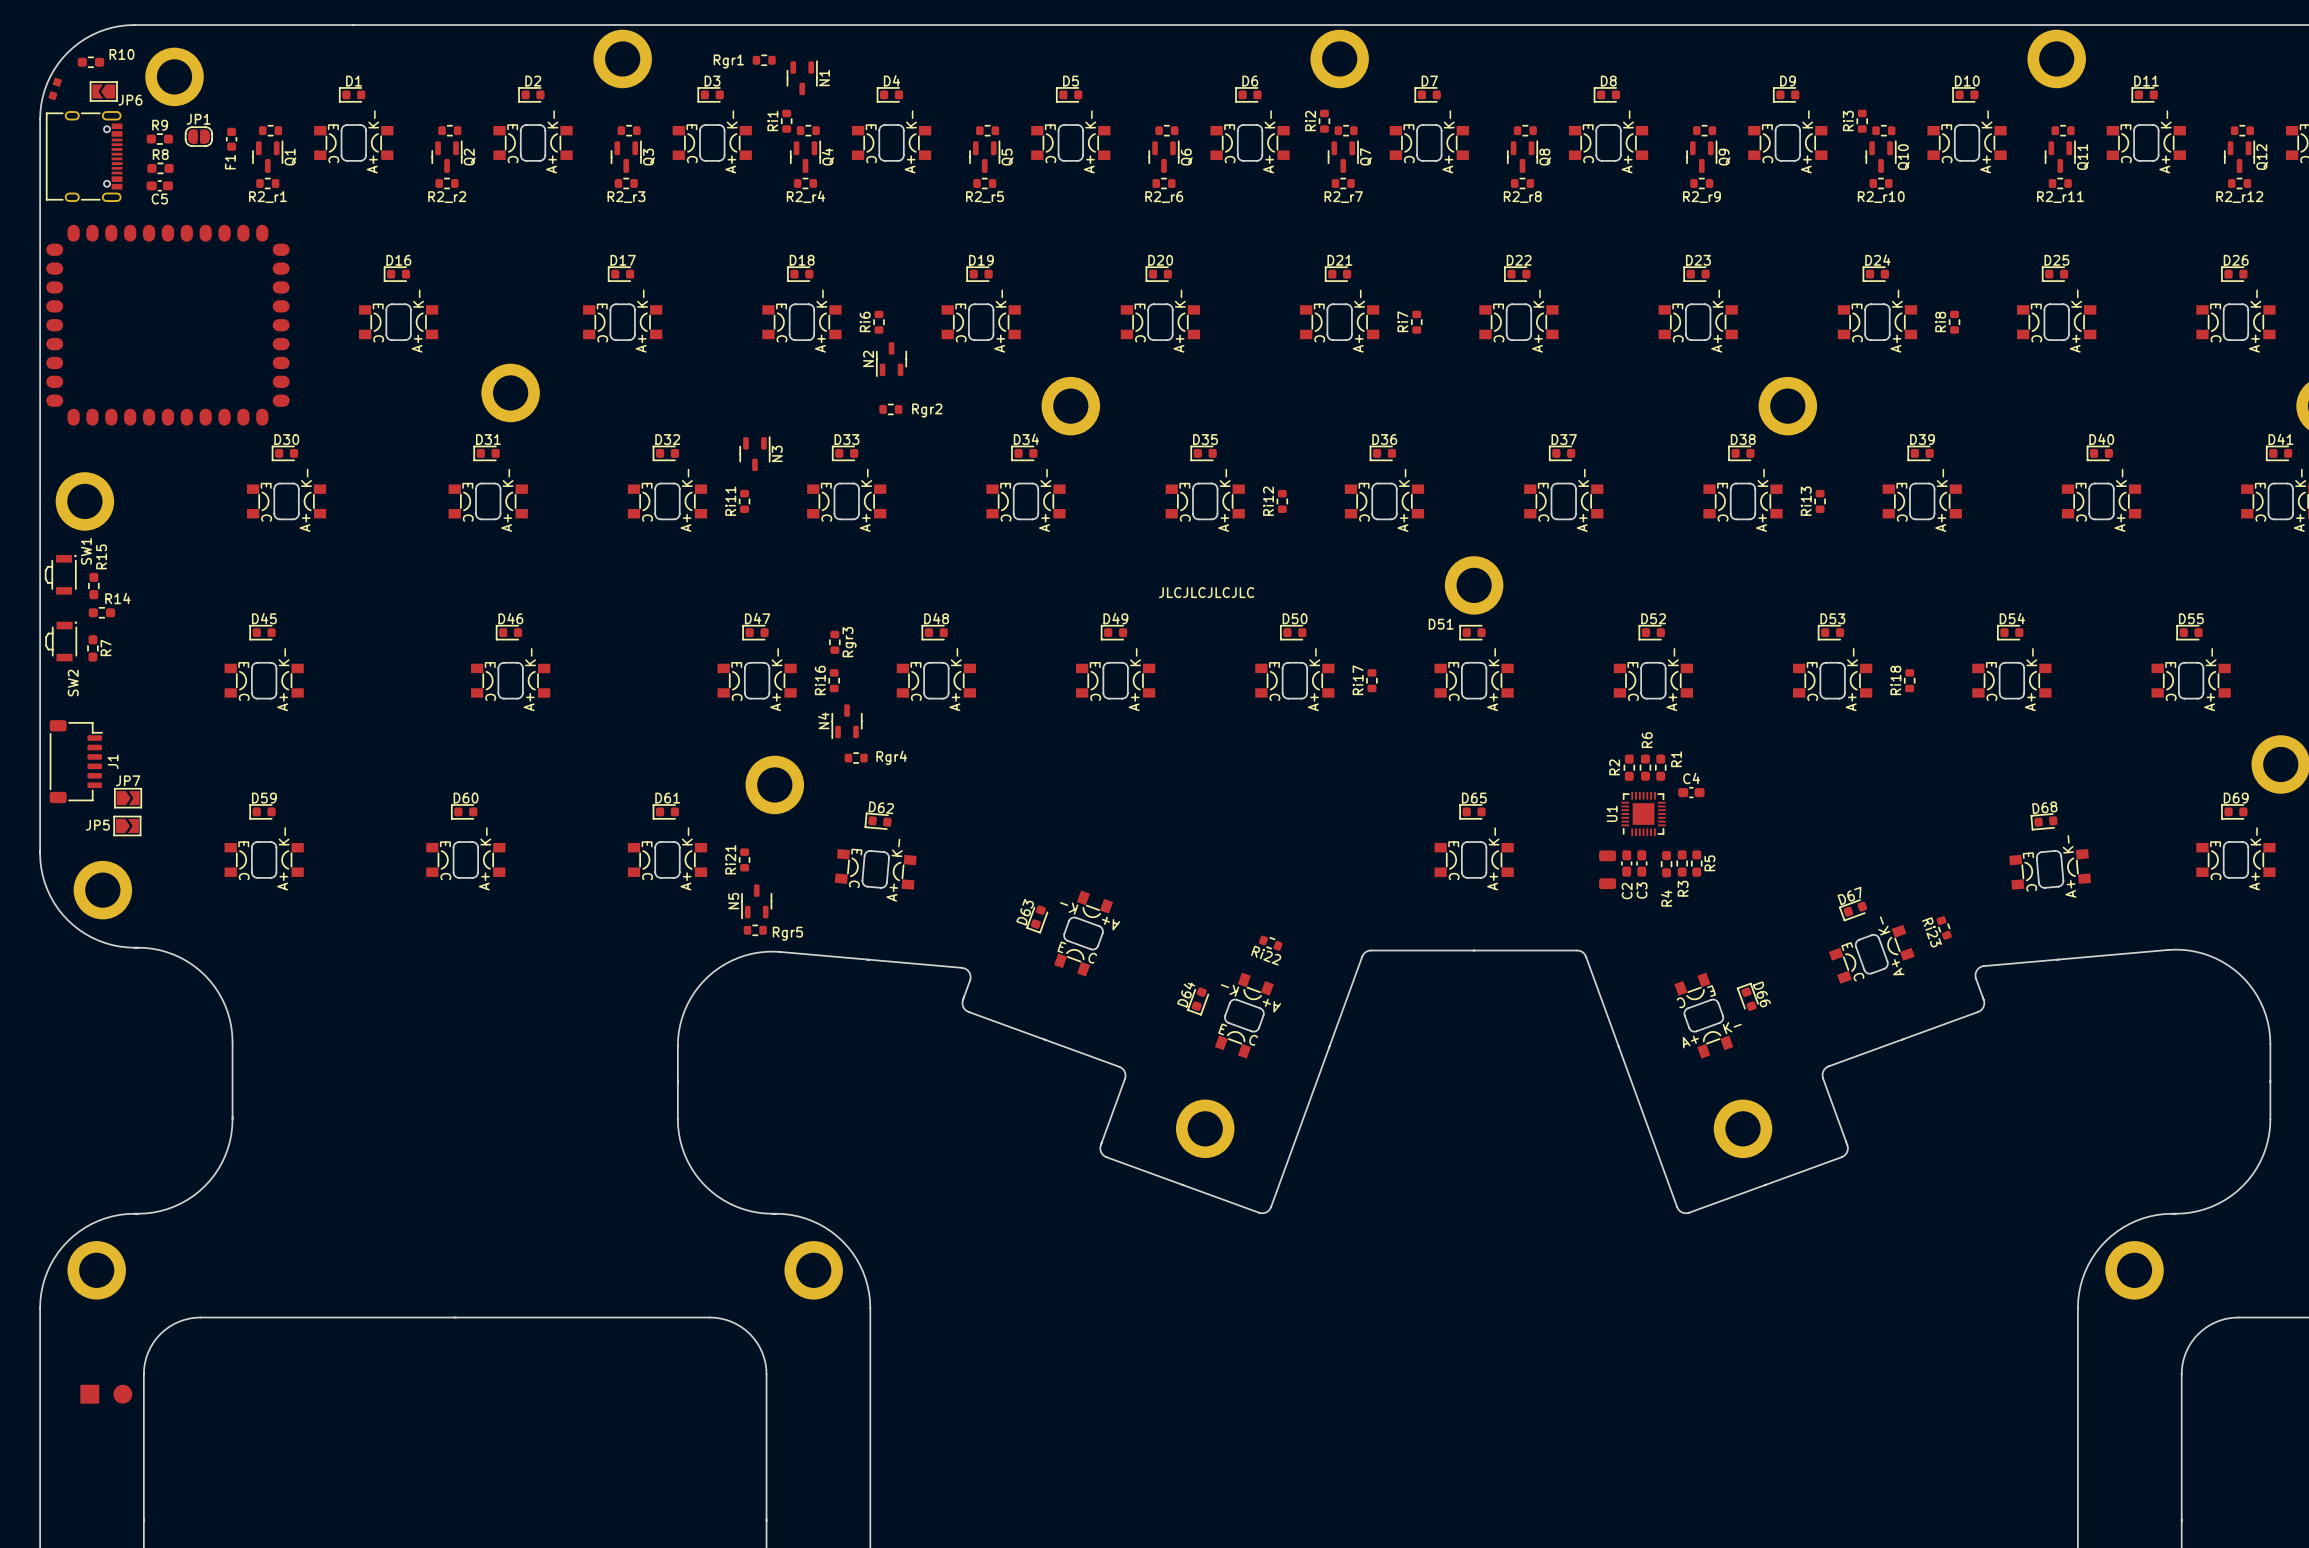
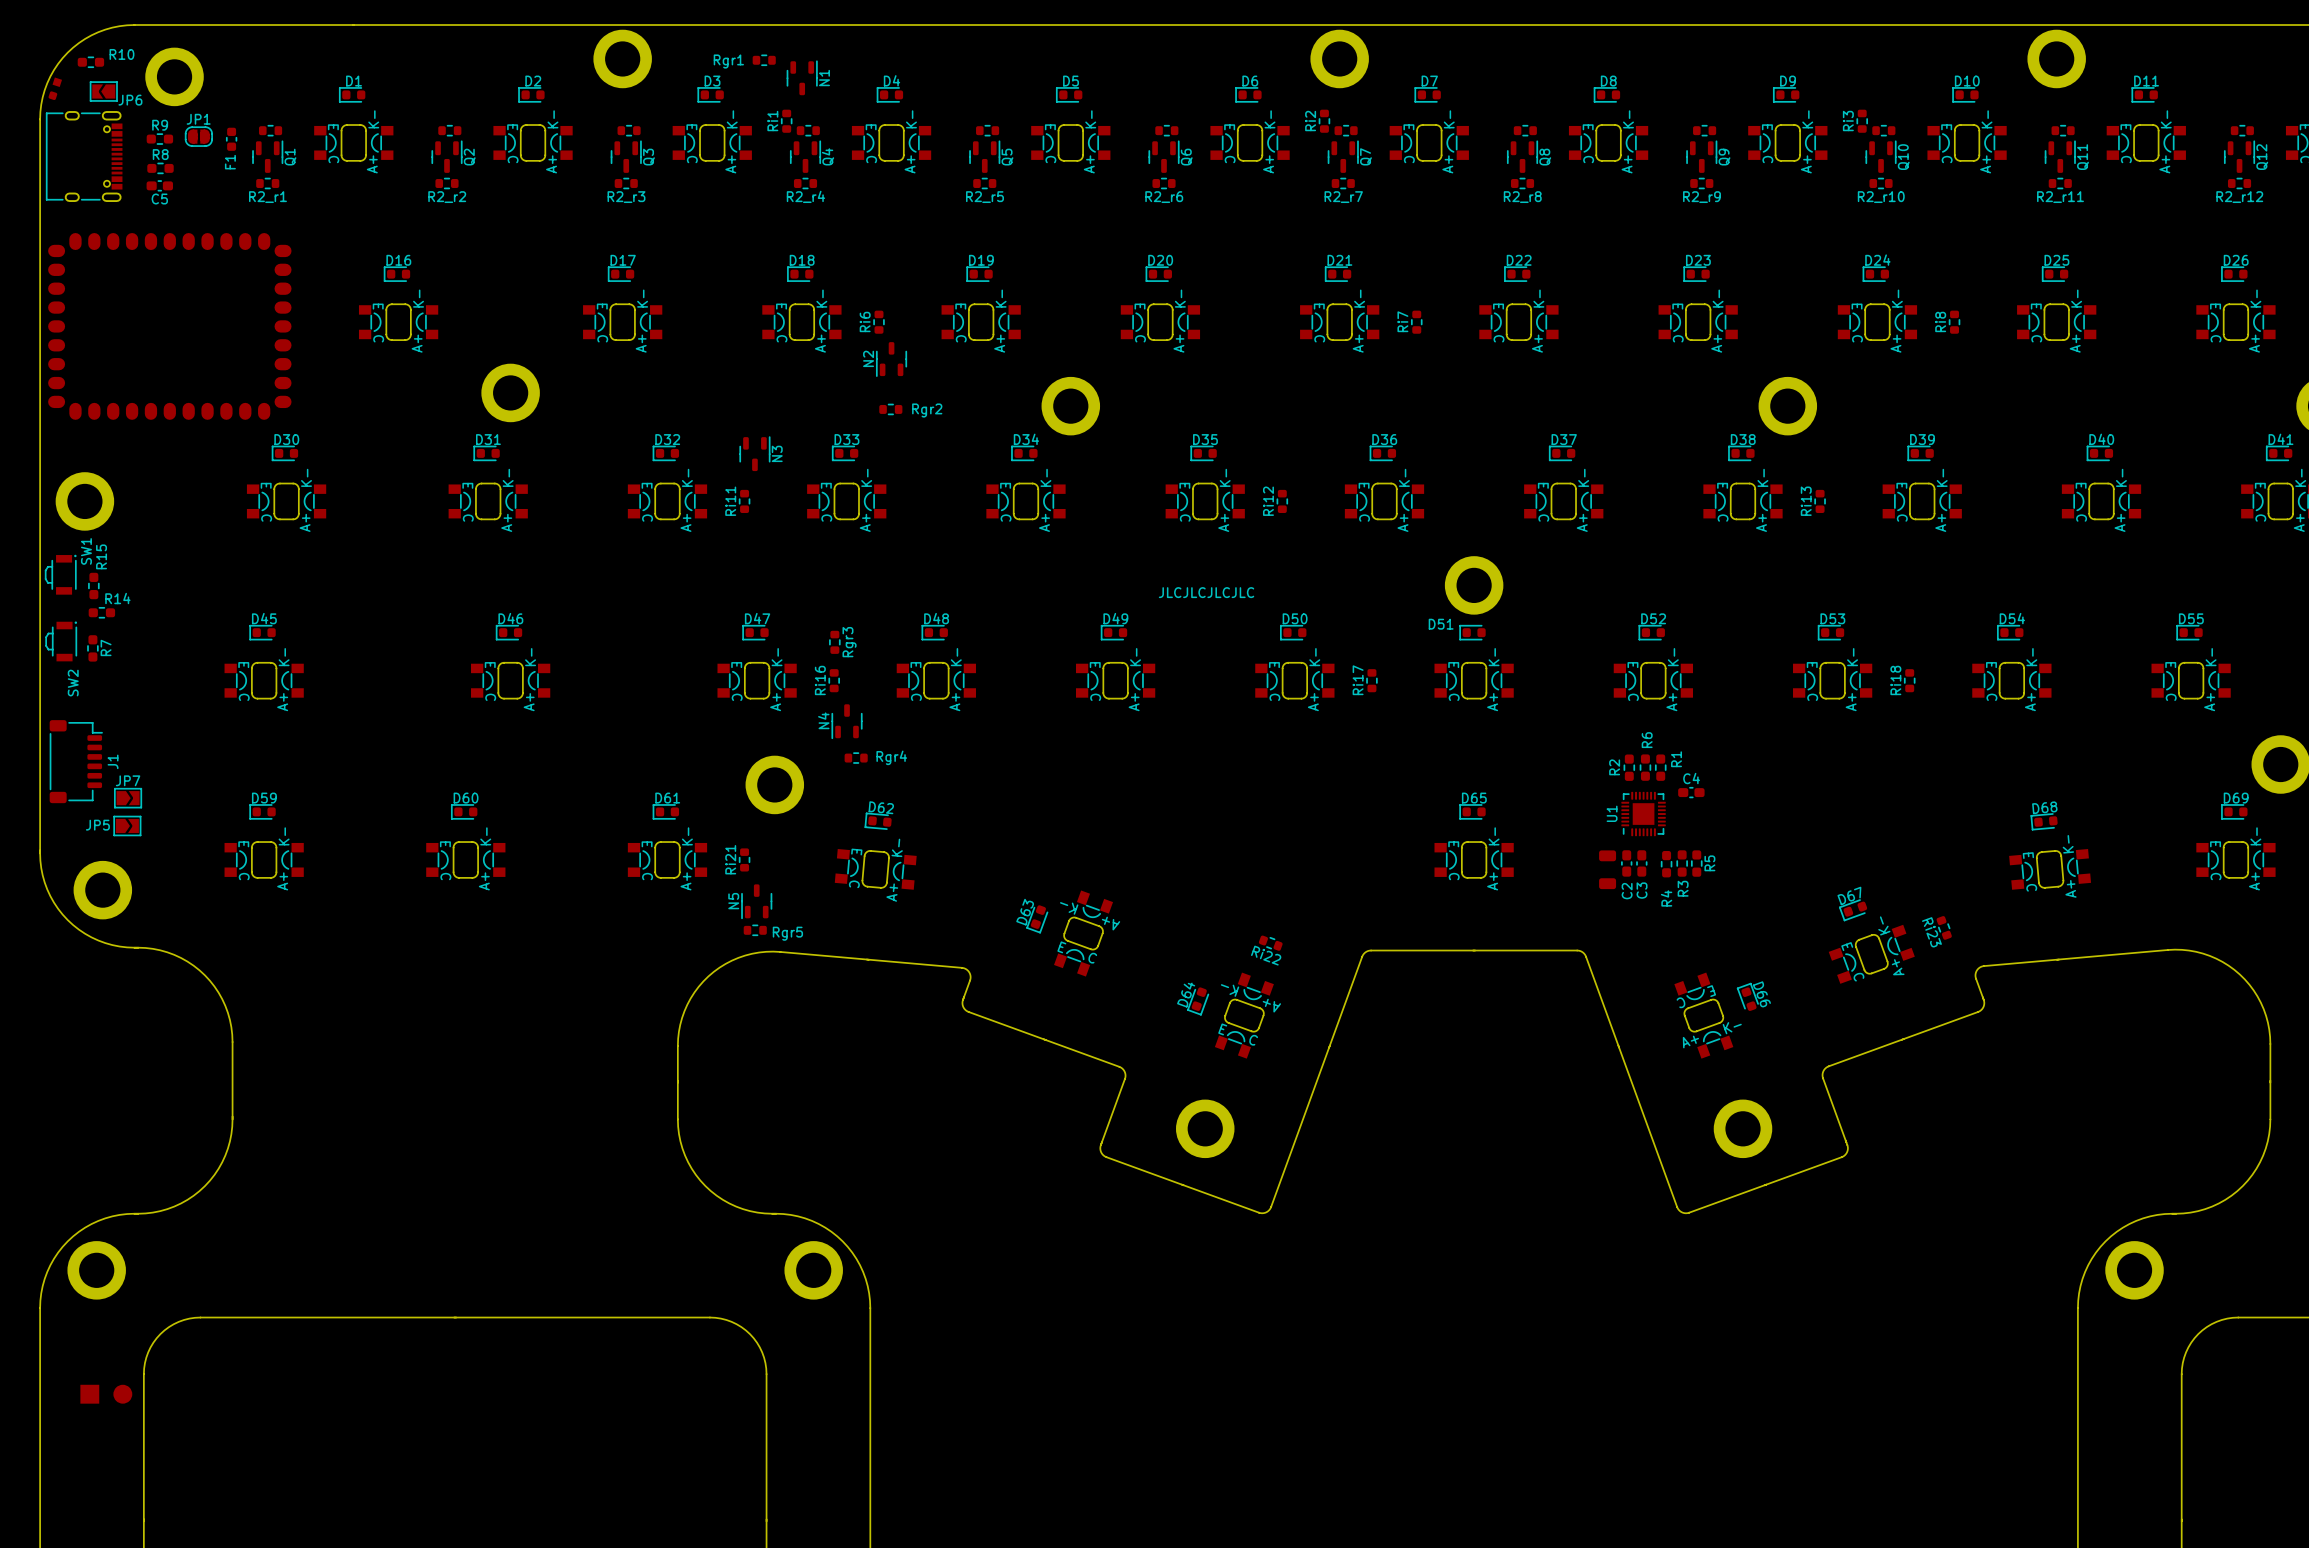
part footprint: [46, 224, 290, 426] -> [48, 233, 292, 420]

